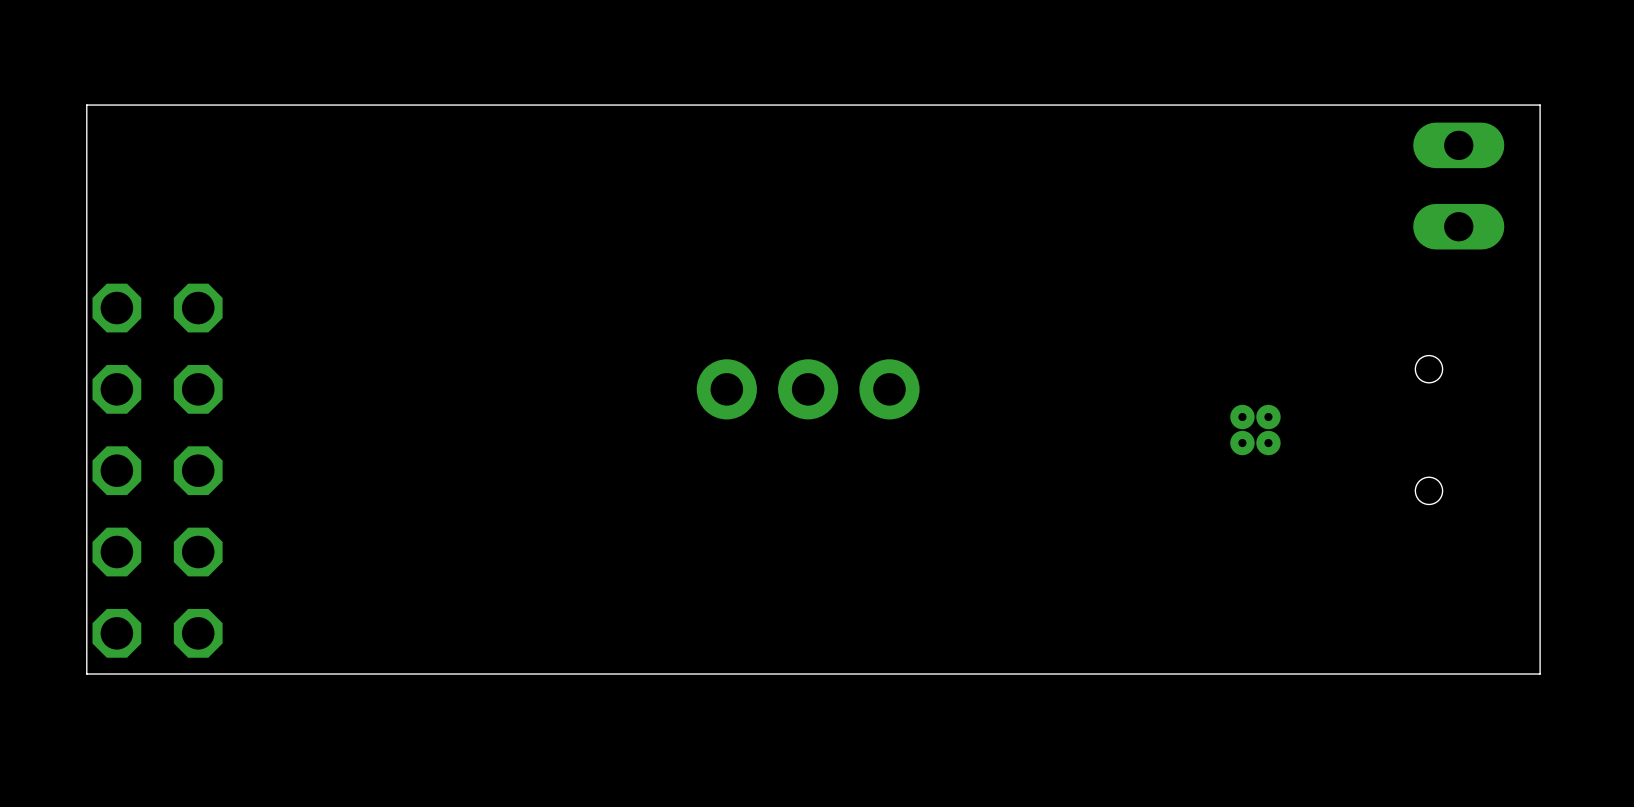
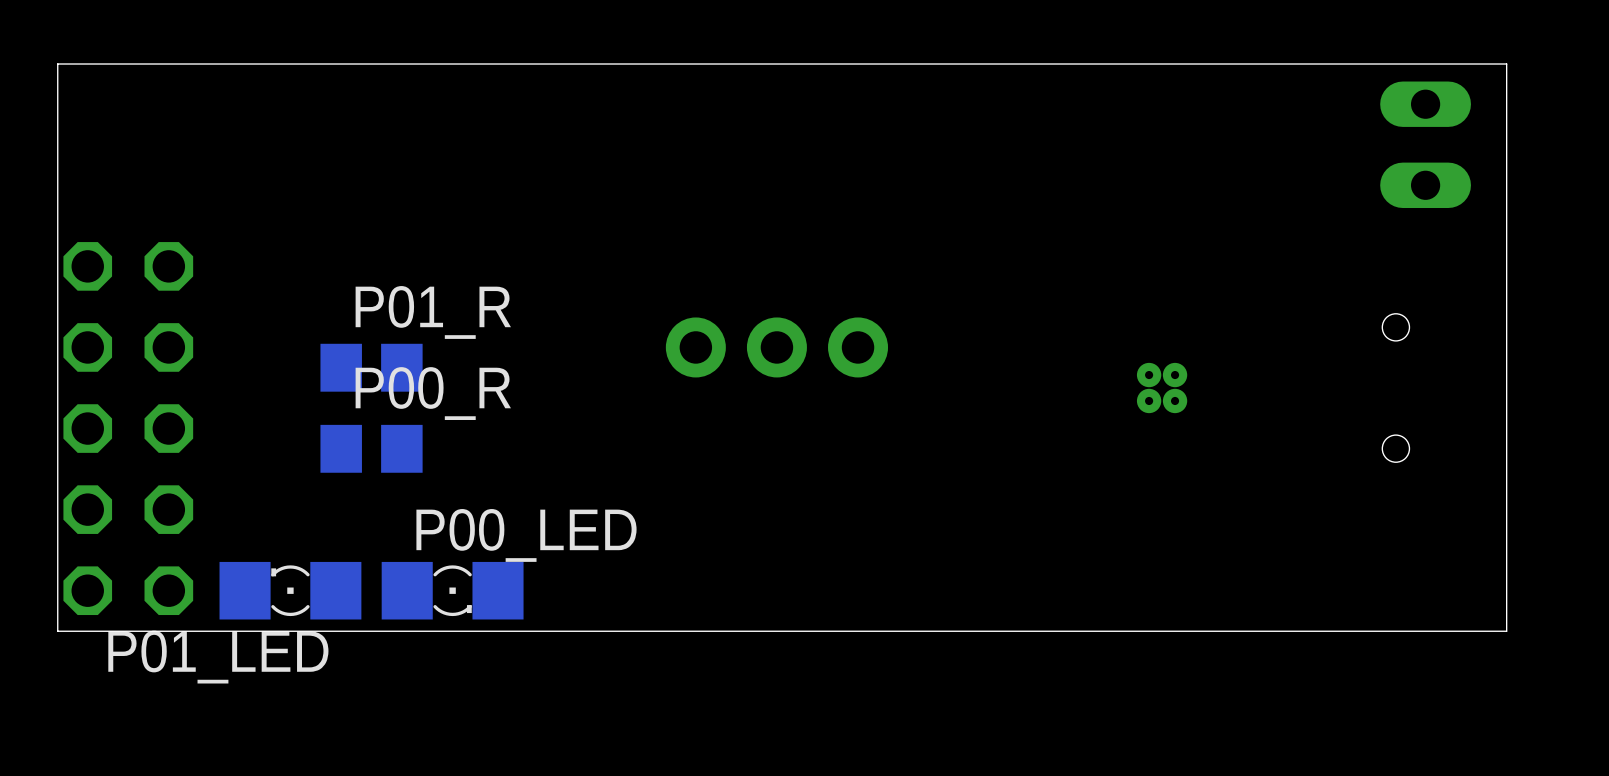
P01_R: none -> (371, 367)
part position: (1255, 430) -> (1162, 388)
P00_R: none -> (371, 448)
P01_LED: none -> (290, 590)
P00_LED: none -> (452, 590)

